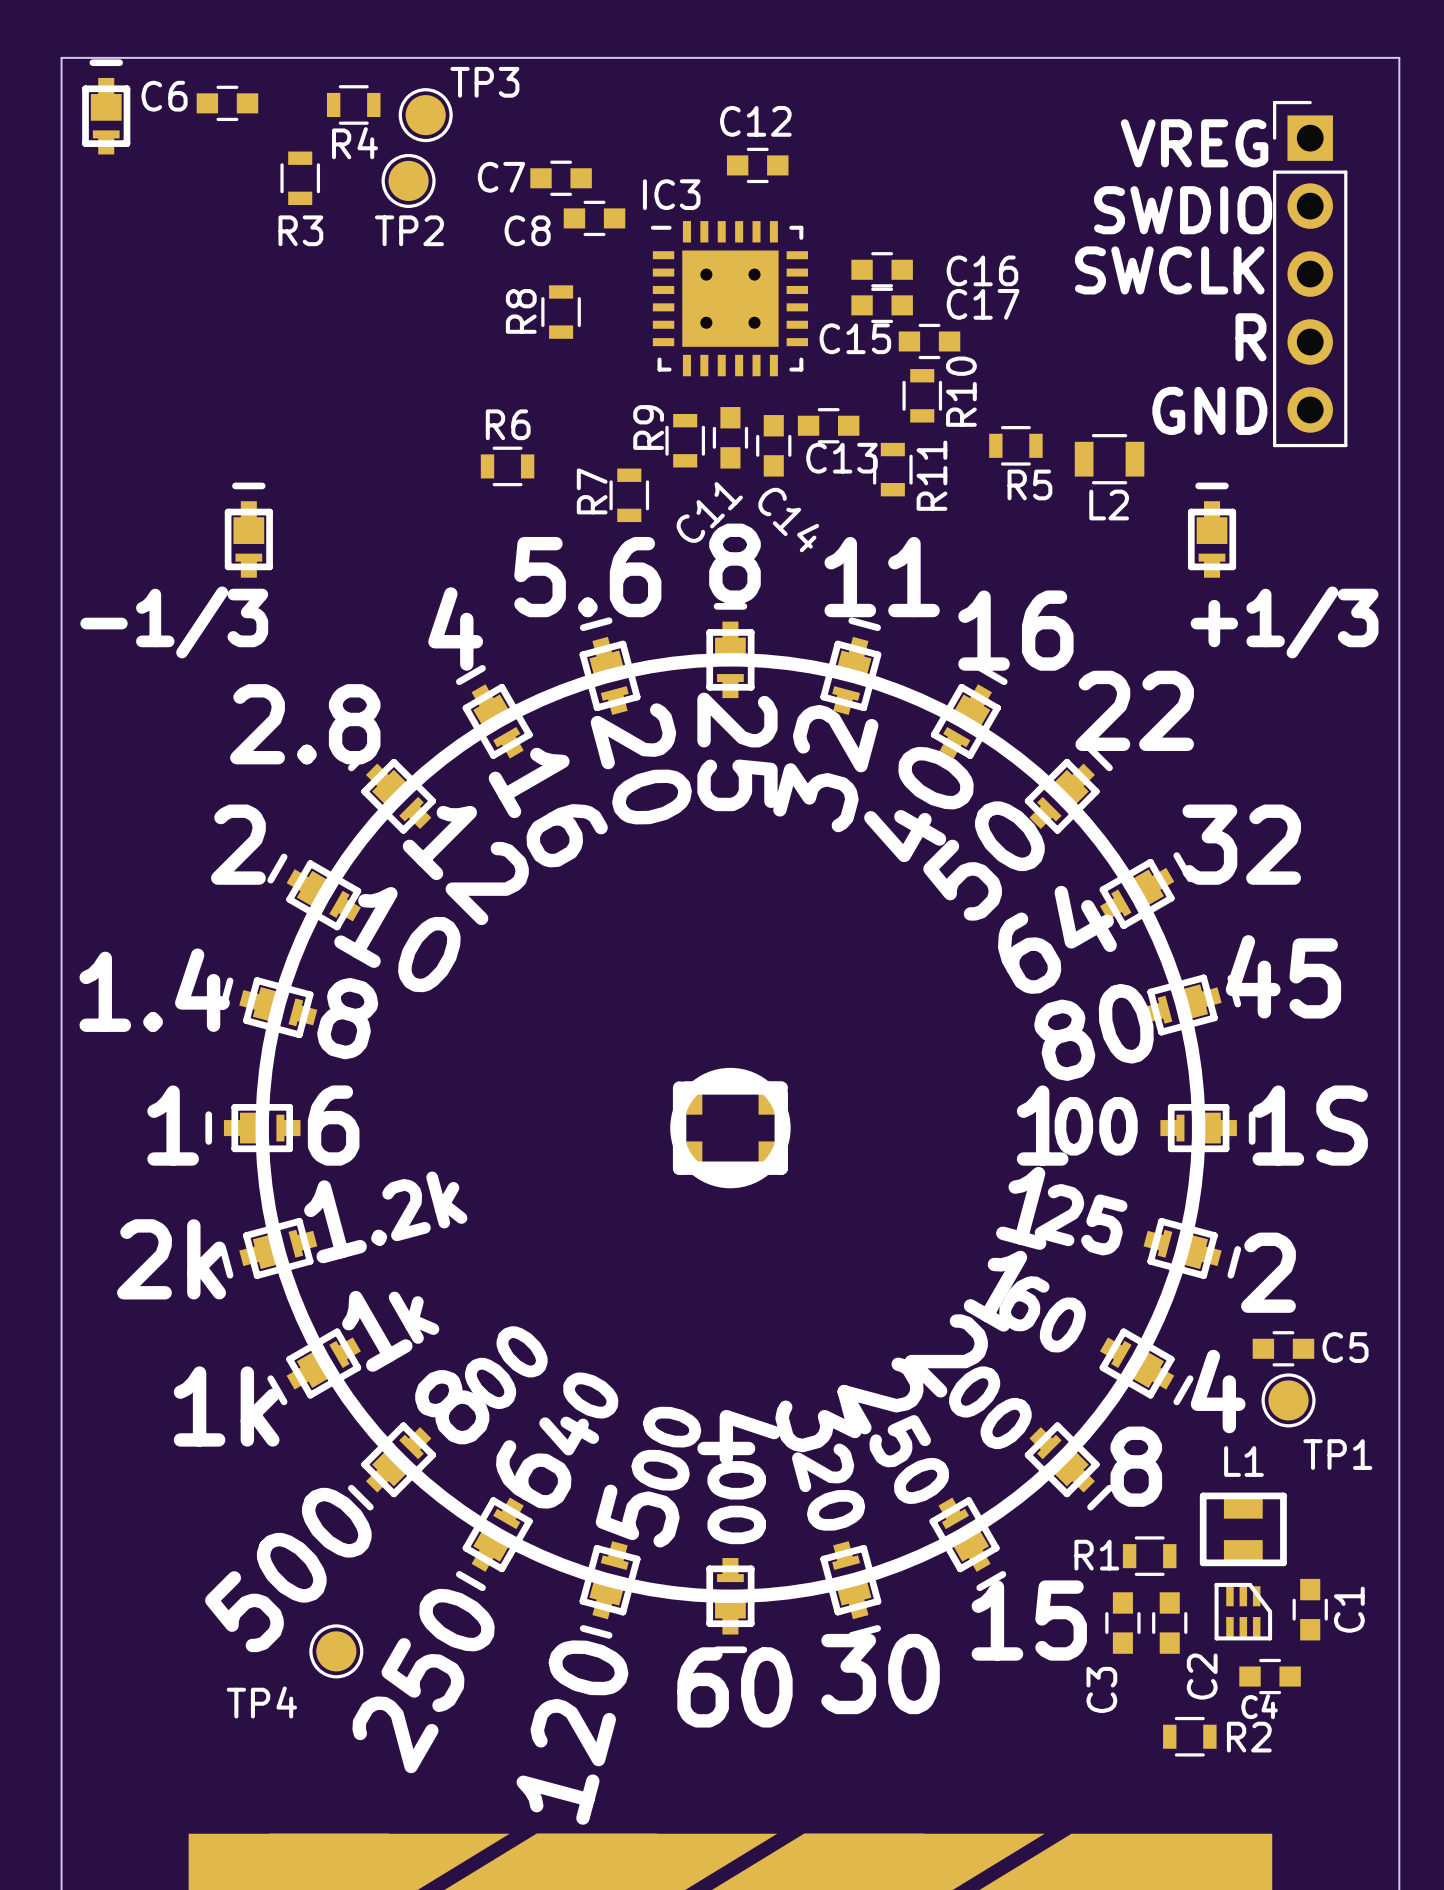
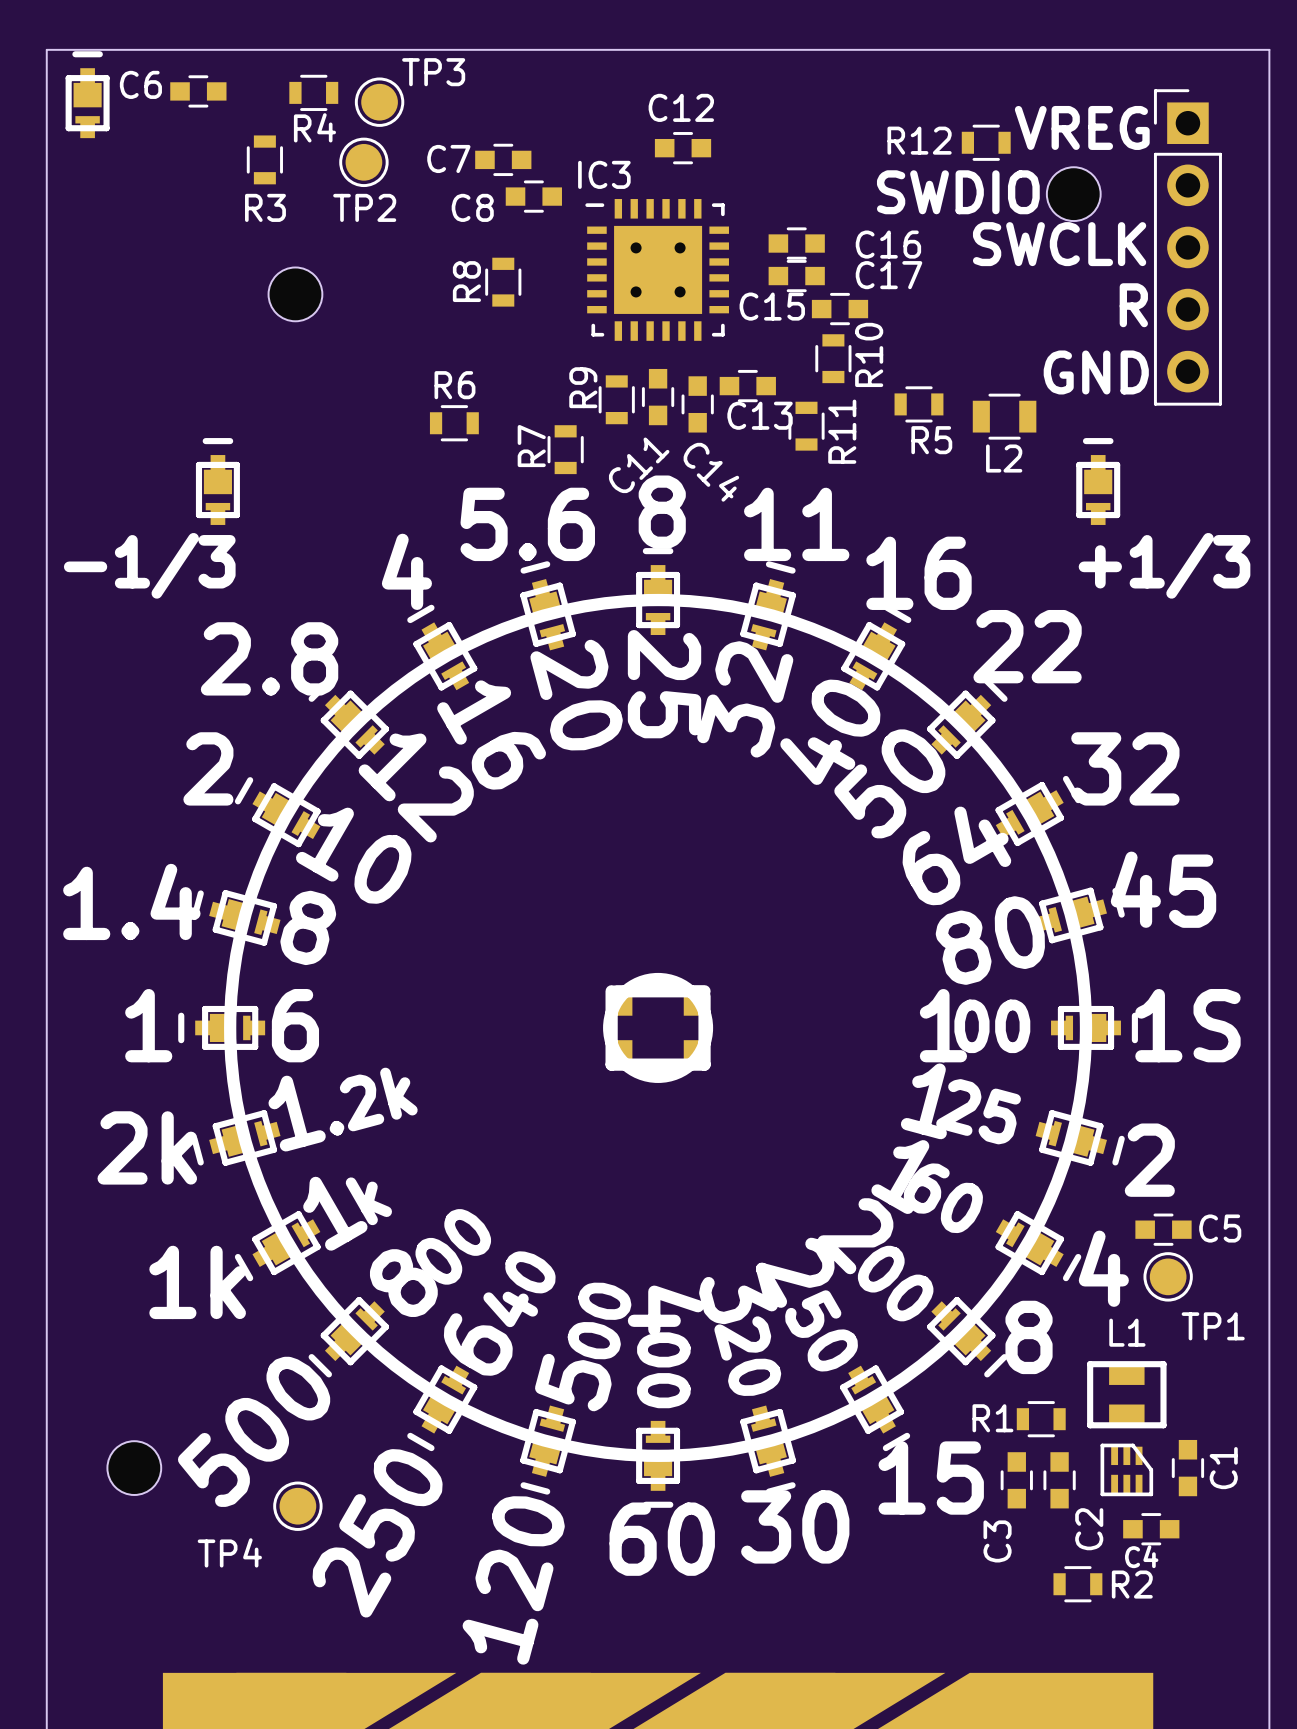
R12: none -> (986, 142)
text position: SWDIO (1183, 210) -> SWDIO (958, 192)
part: none -> (1073, 194)
part: none -> (295, 294)
part: none -> (134, 1468)

